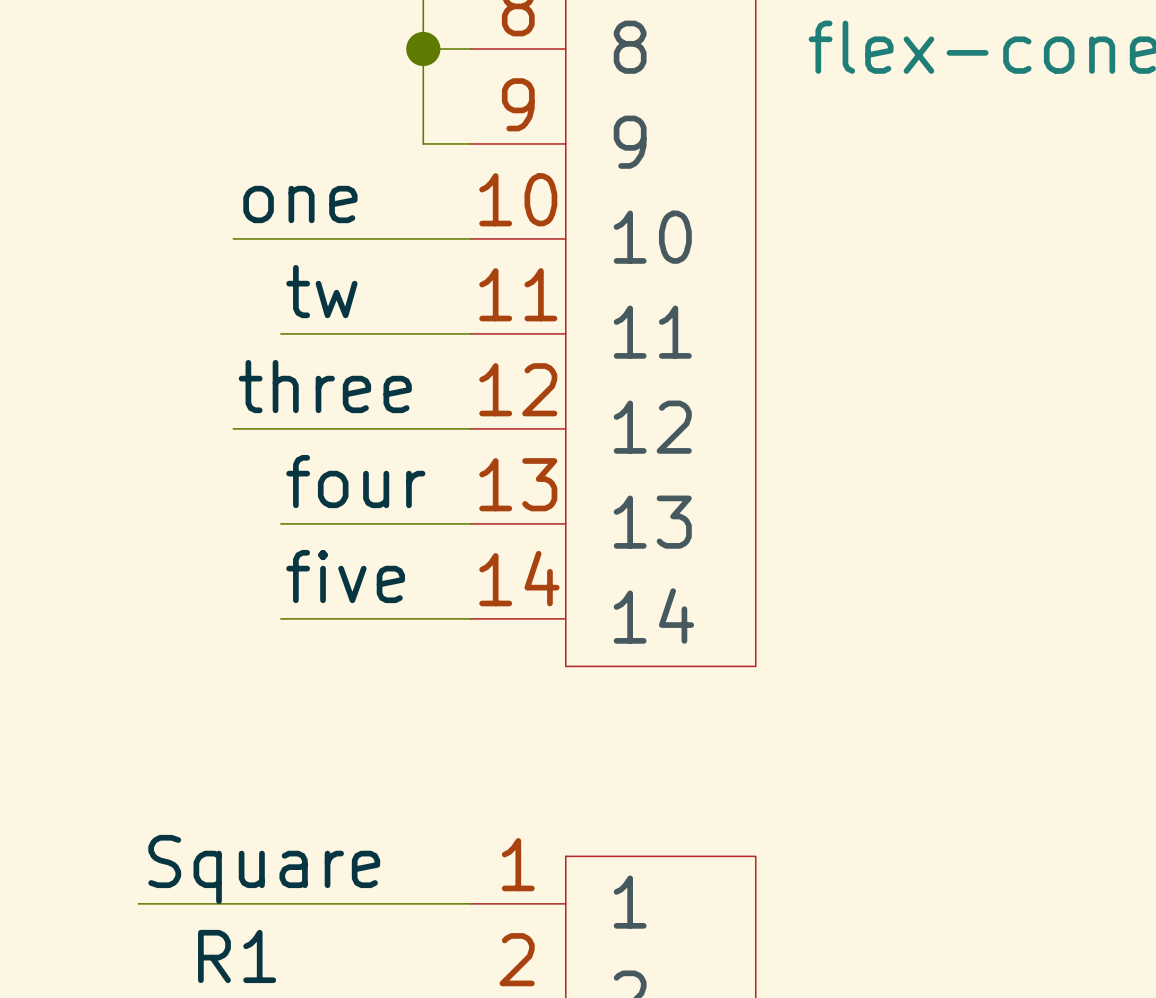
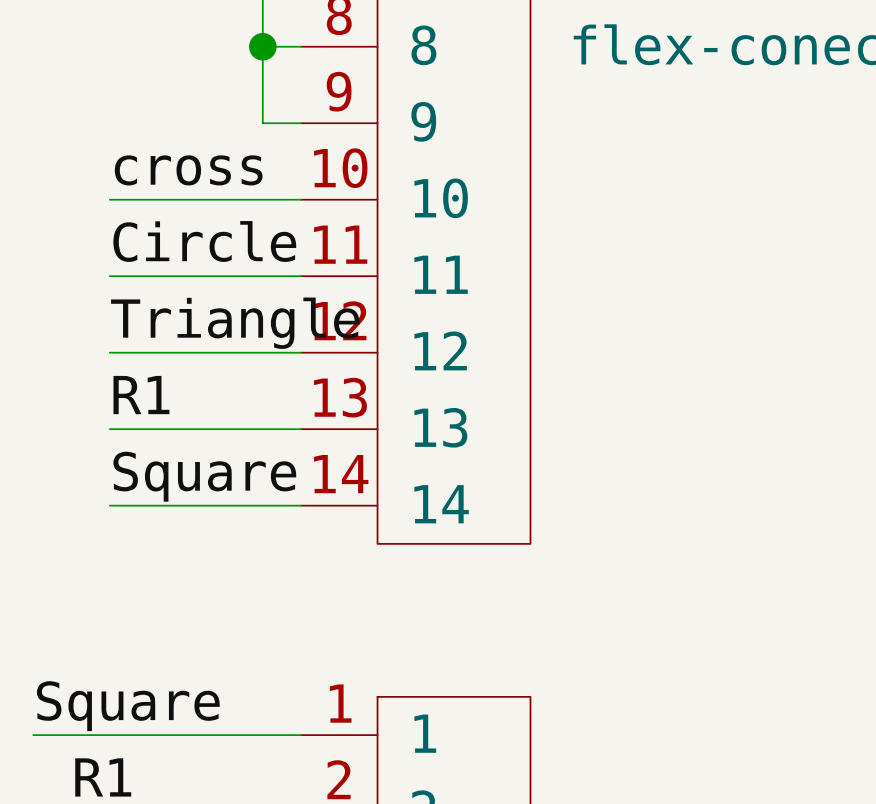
label: one (300, 204) -> cross (188, 170)
label: tw (321, 291) -> none
label: none -> Circle (204, 241)
wire: none -> (109, 276) (148, 276)
label: three (325, 386) -> Triangle (235, 323)
label: none -> R1 (141, 395)
label: four (355, 481) -> none
wire: none -> (109, 429) (148, 429)
label: five (345, 576) -> none
label: none -> Square (204, 476)
wire: none -> (109, 505) (148, 505)

